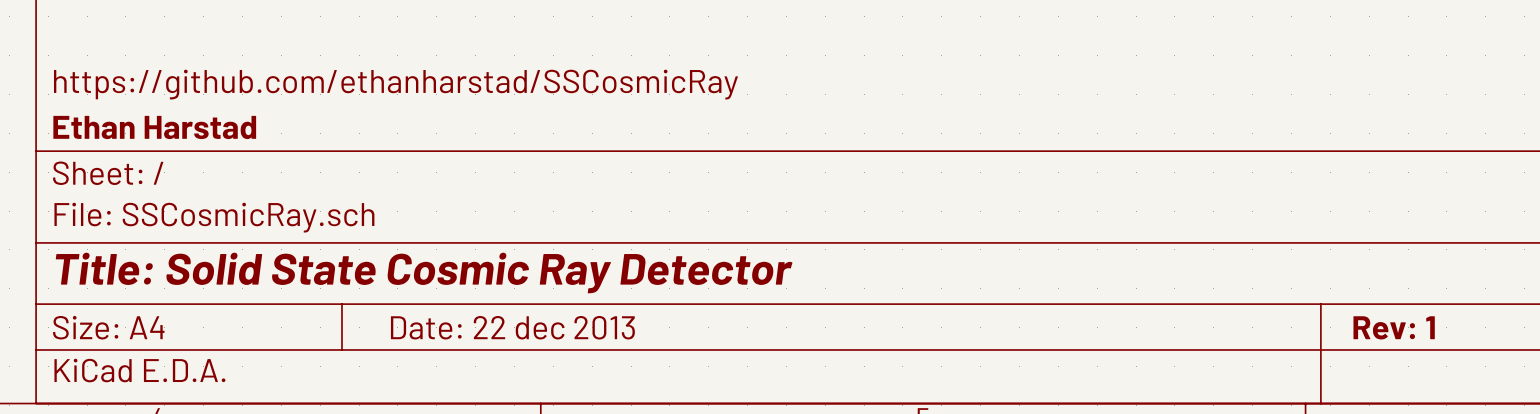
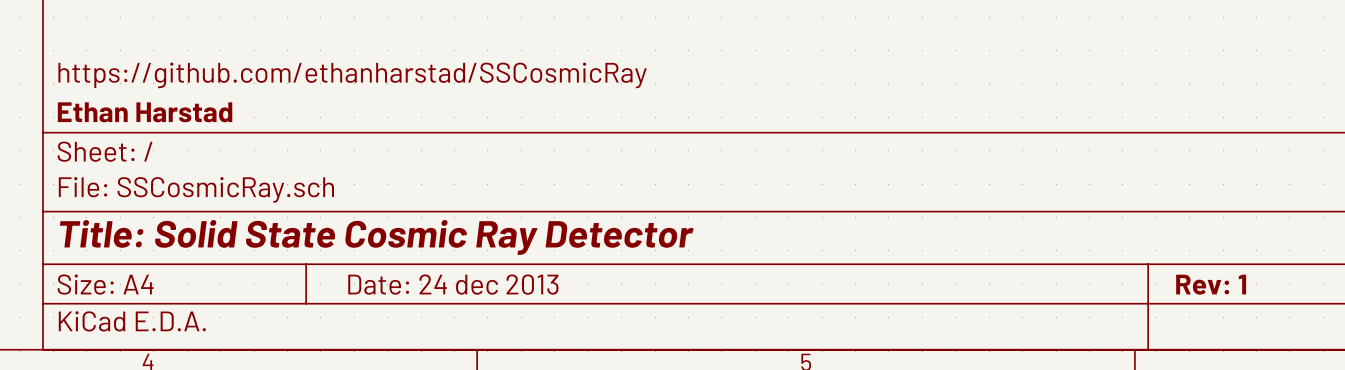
title block: Date: 22 dec 2013 (512, 327) -> Date: 24 dec 2013 (453, 284)

